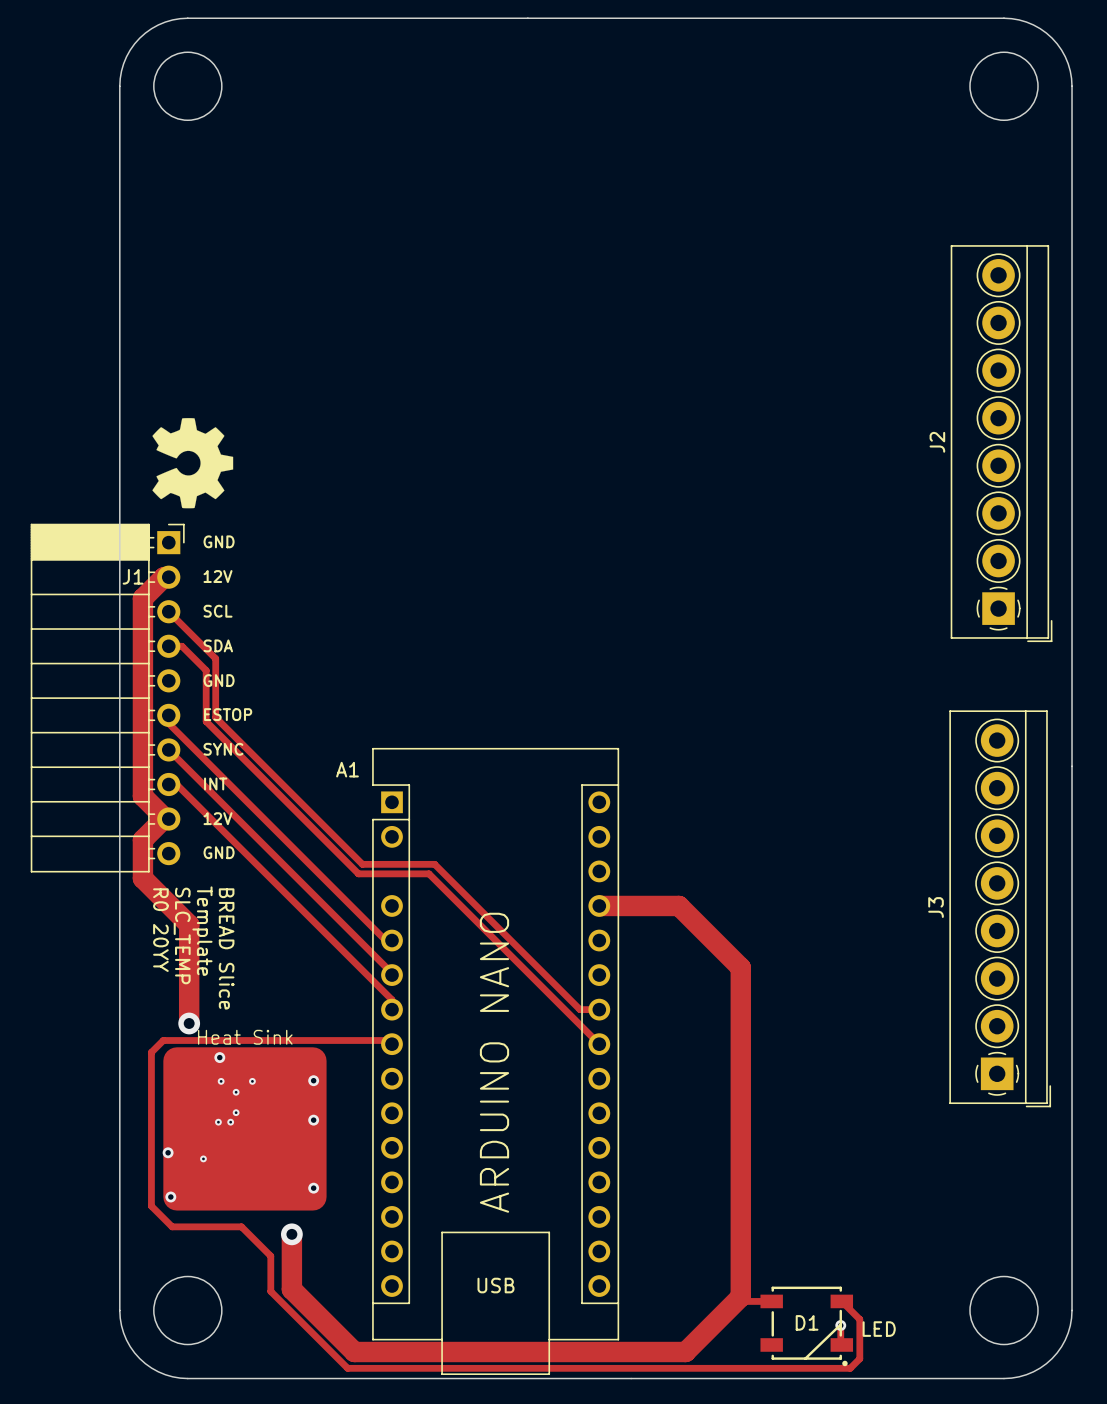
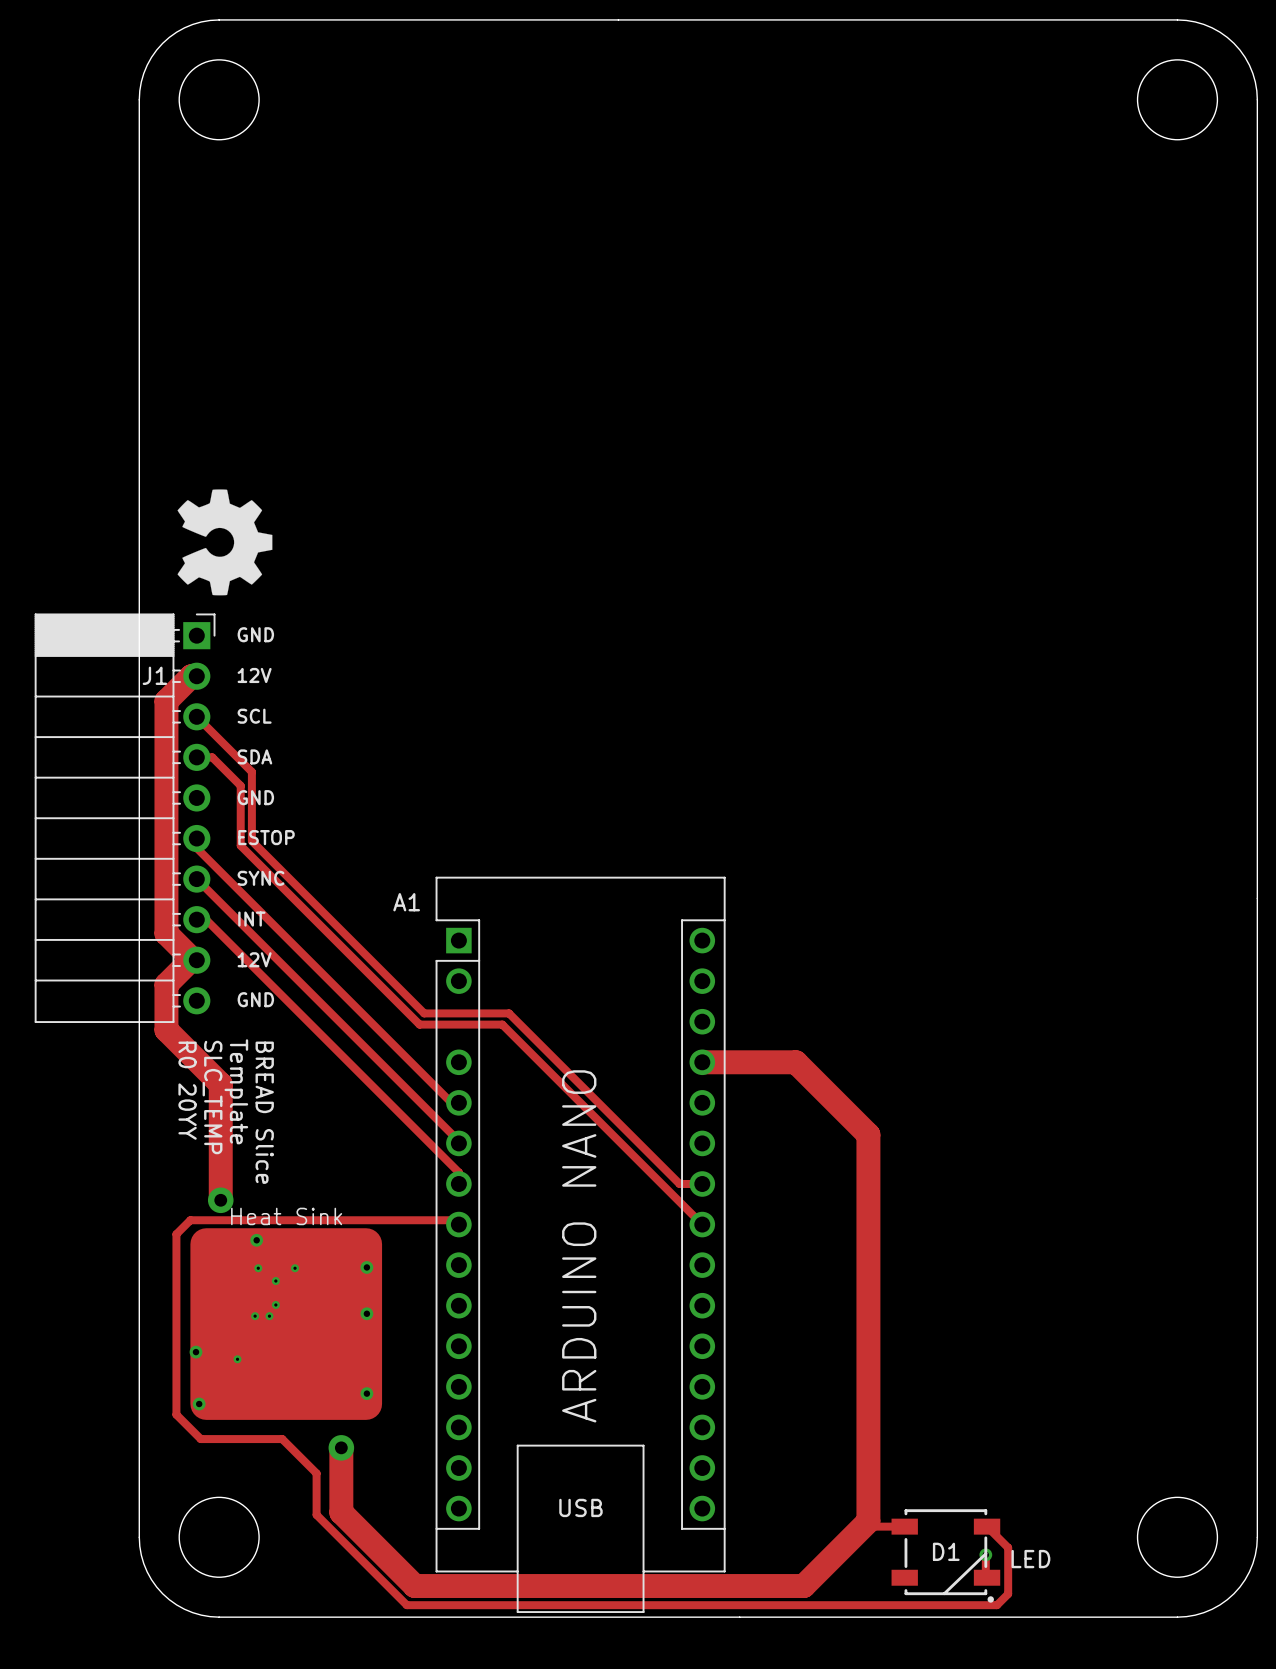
J2: (1001, 443) -> none
J3: (1000, 908) -> none

